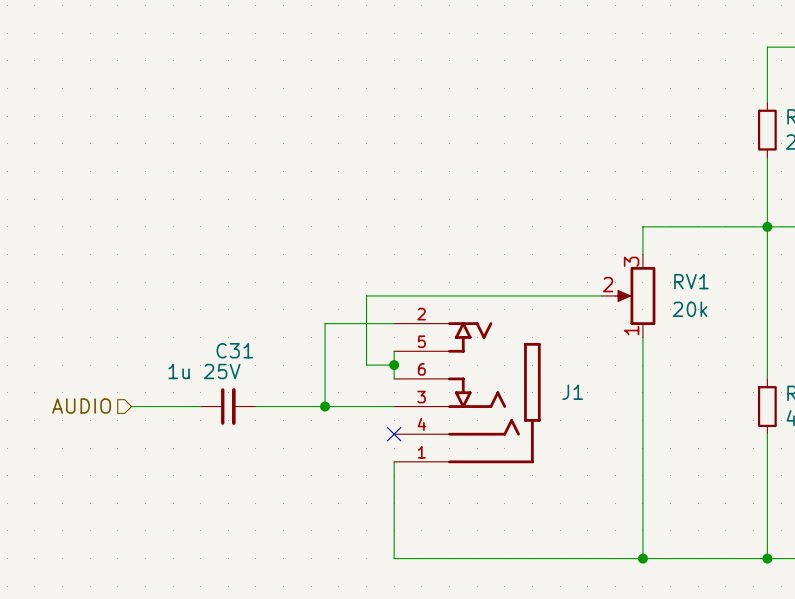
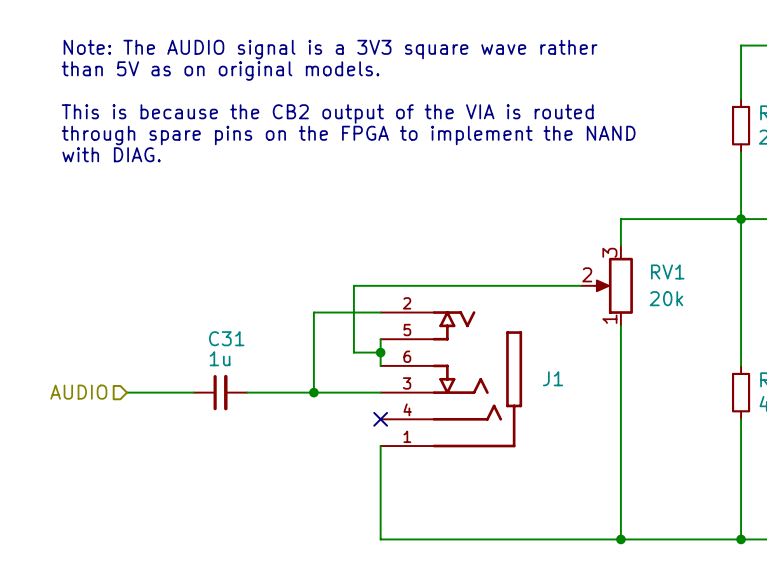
text: none -> Note: The AUDIO signal is a 3V3 square wave rather (330, 49)
text: none -> than 5V as on original models. (220, 71)
text: none -> This is because the CB2 output of the VIA is routed (327, 114)
text: none -> through spare pins on the FPGA to implement the NAND (348, 135)
text: none -> with DIAG. (111, 154)
C31 value: 1u 25V (204, 371) -> 1u (220, 358)

